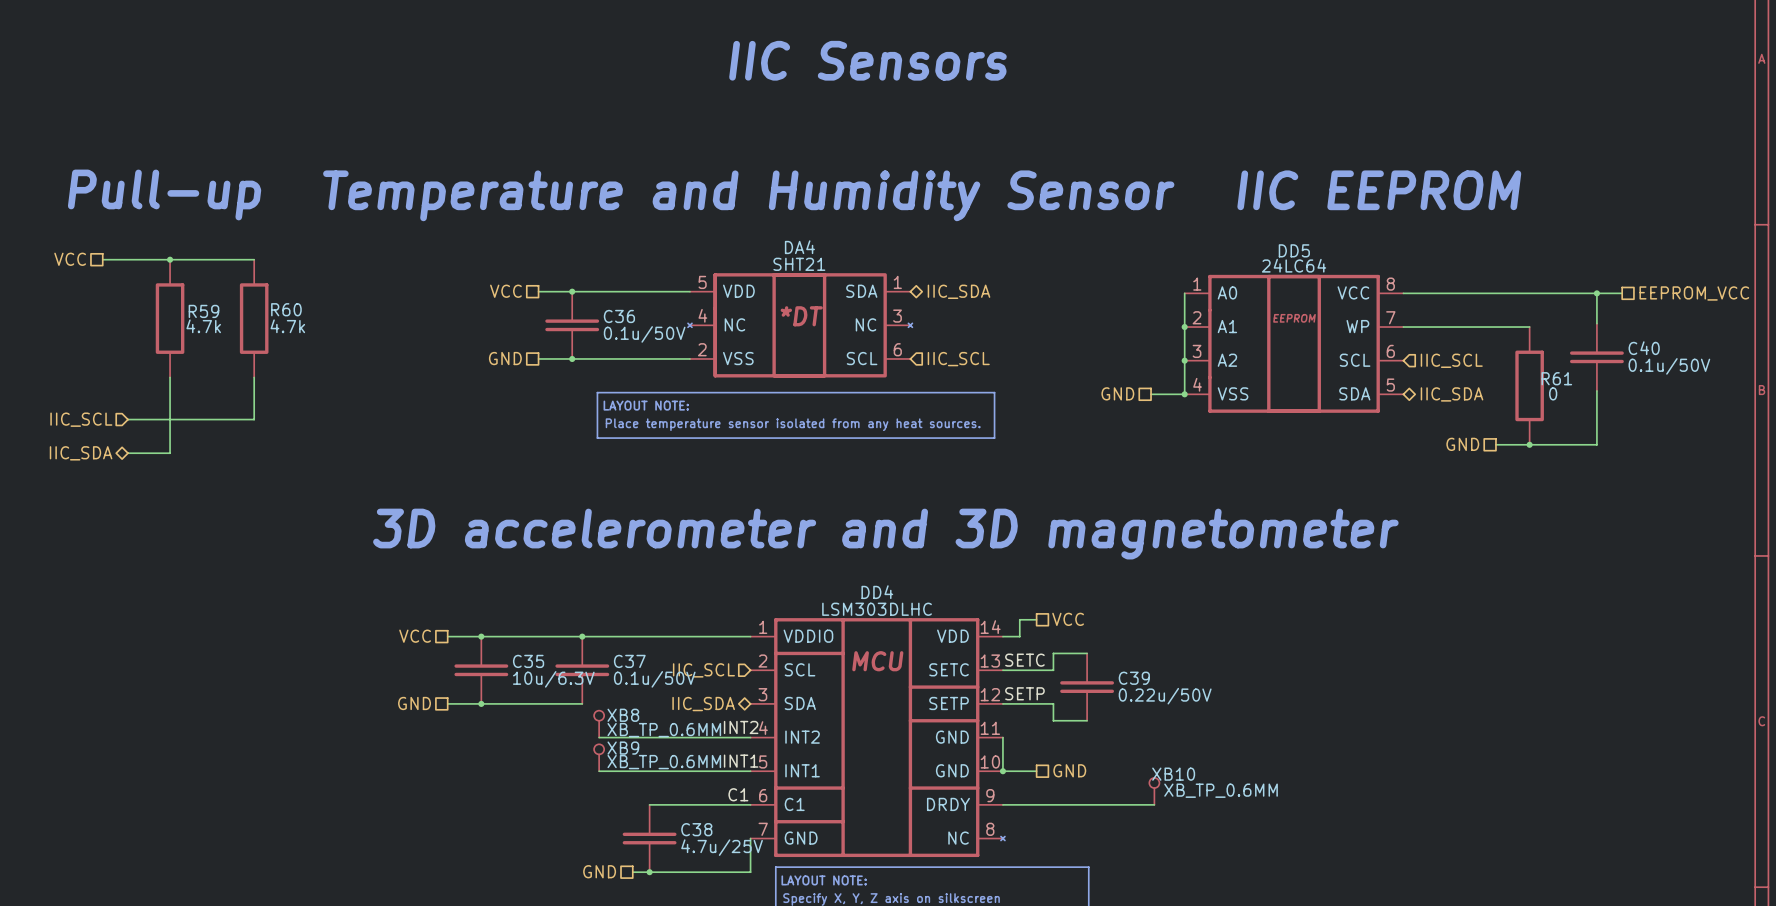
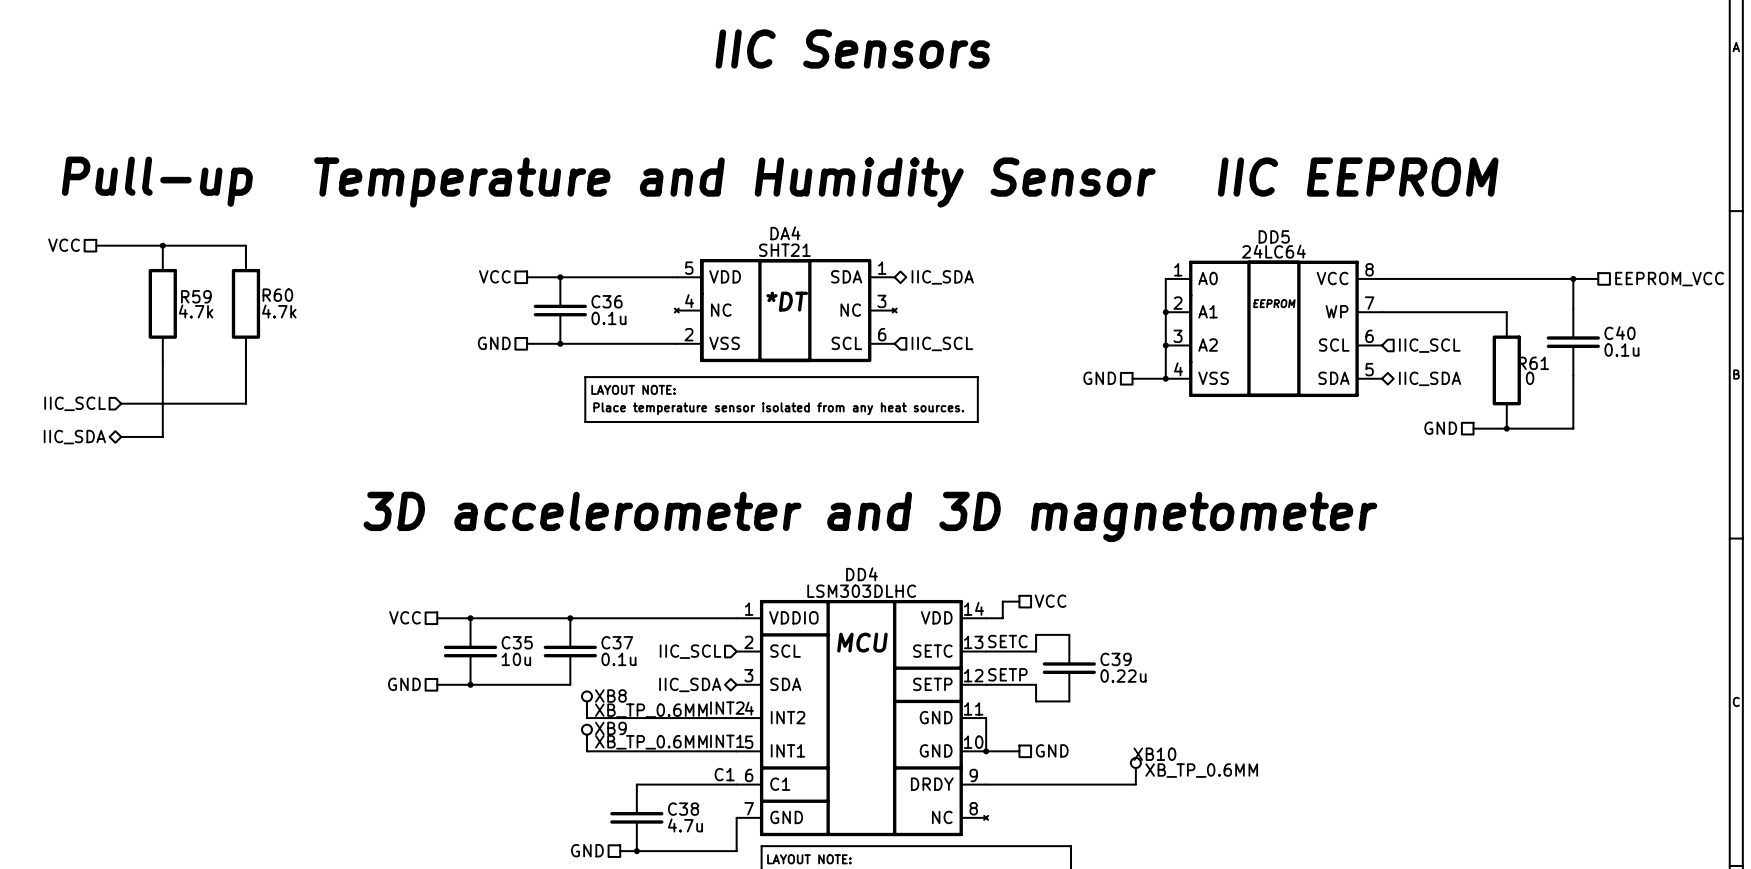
C36 value: 0.1u/50V (644, 334) -> 0.1u (608, 318)
C40 value: 0.1u/50V (1669, 366) -> 0.1u (1621, 350)
C35 value: 10u/6.3V (553, 679) -> 10u (516, 659)
C37 value: 0.1u/50V (654, 679) -> 0.1u (618, 659)
C39 value: 0.22u/50V (1165, 696) -> 0.22u (1123, 676)
C38 value: 4.7u/25V (722, 847) -> 4.7u (685, 825)

